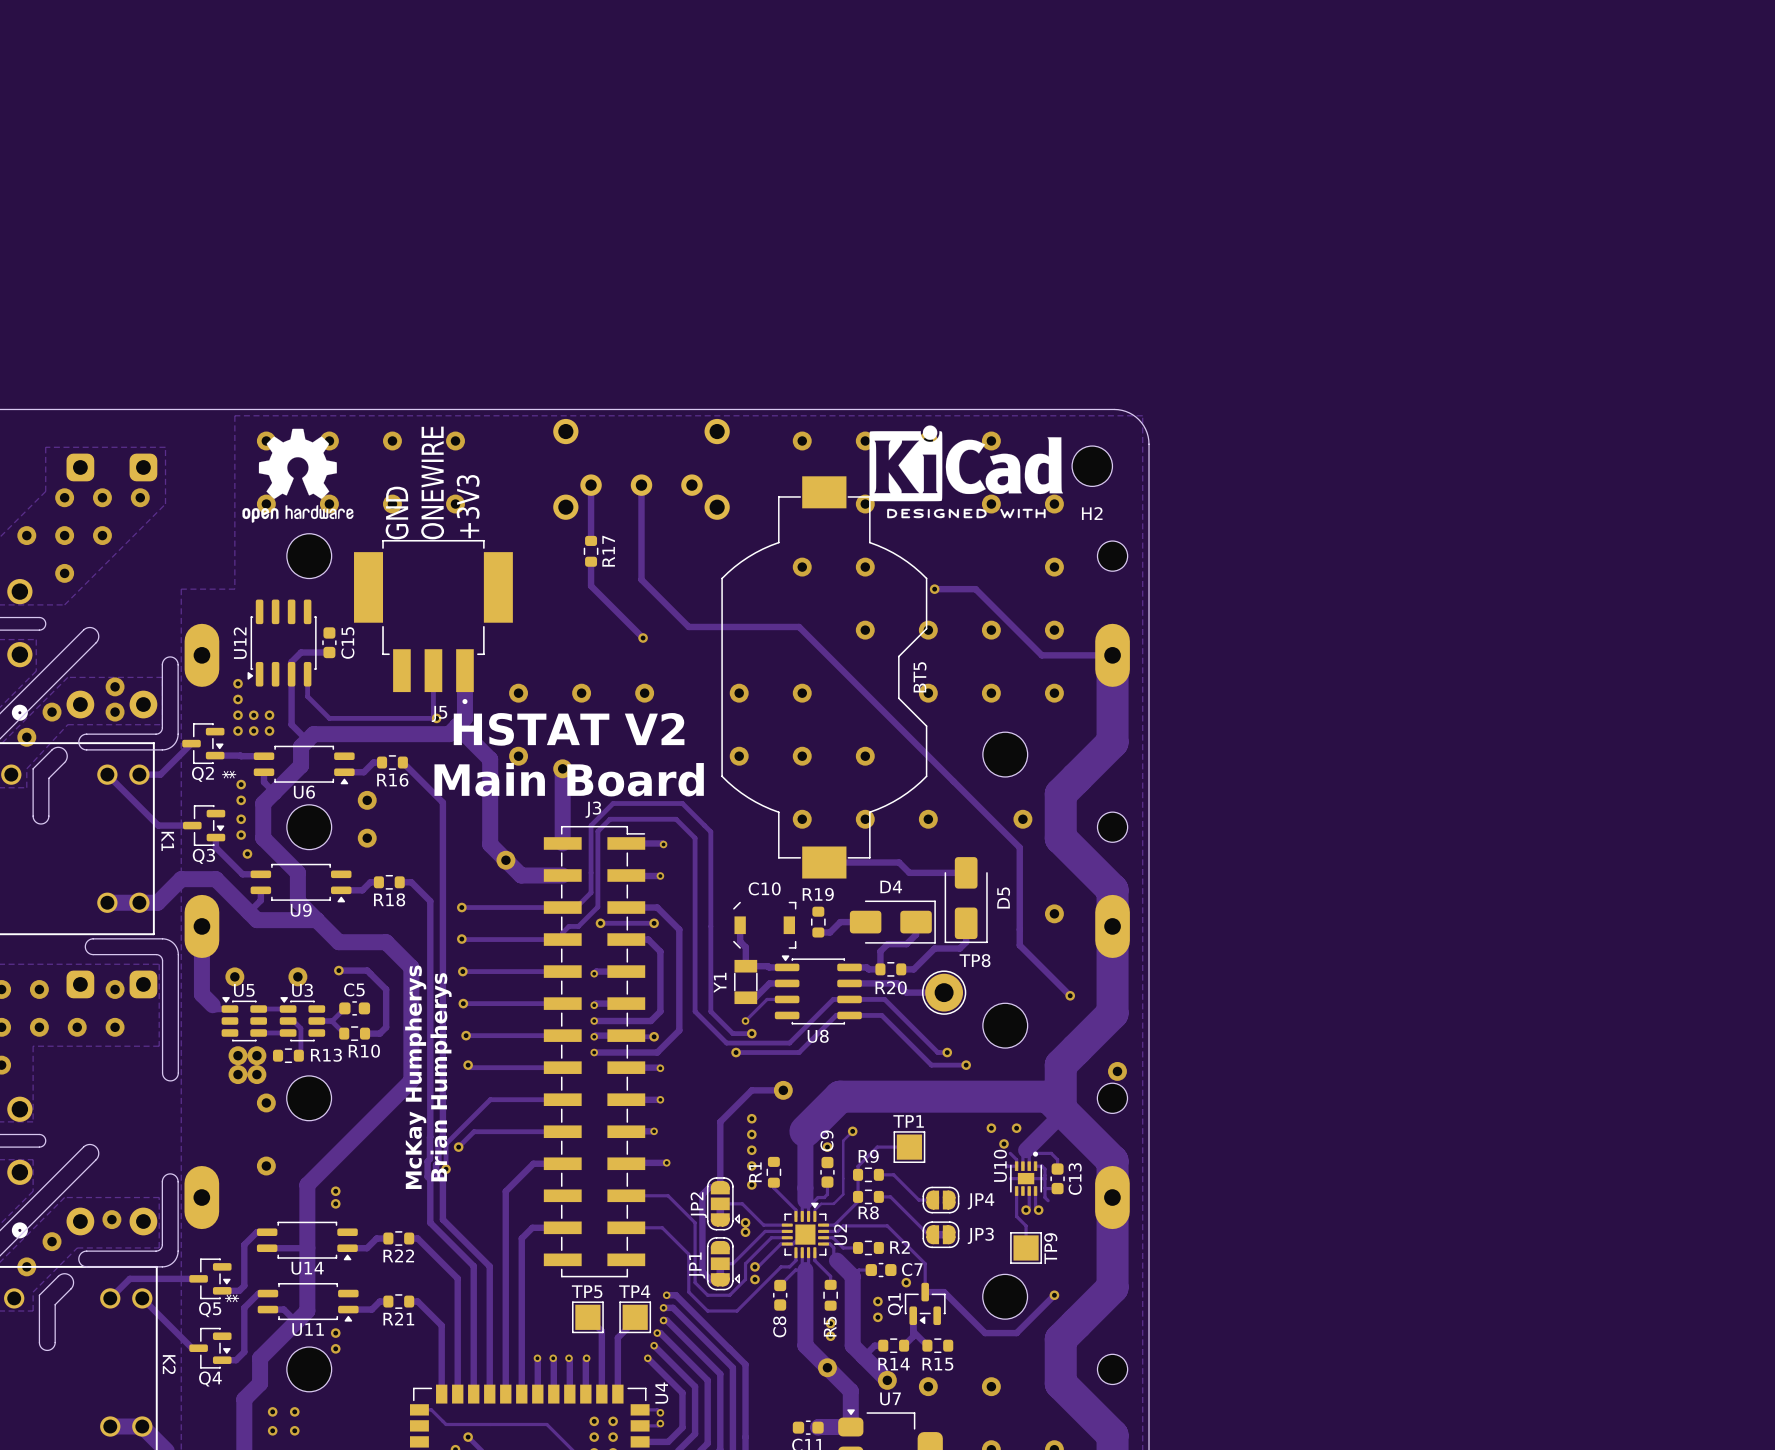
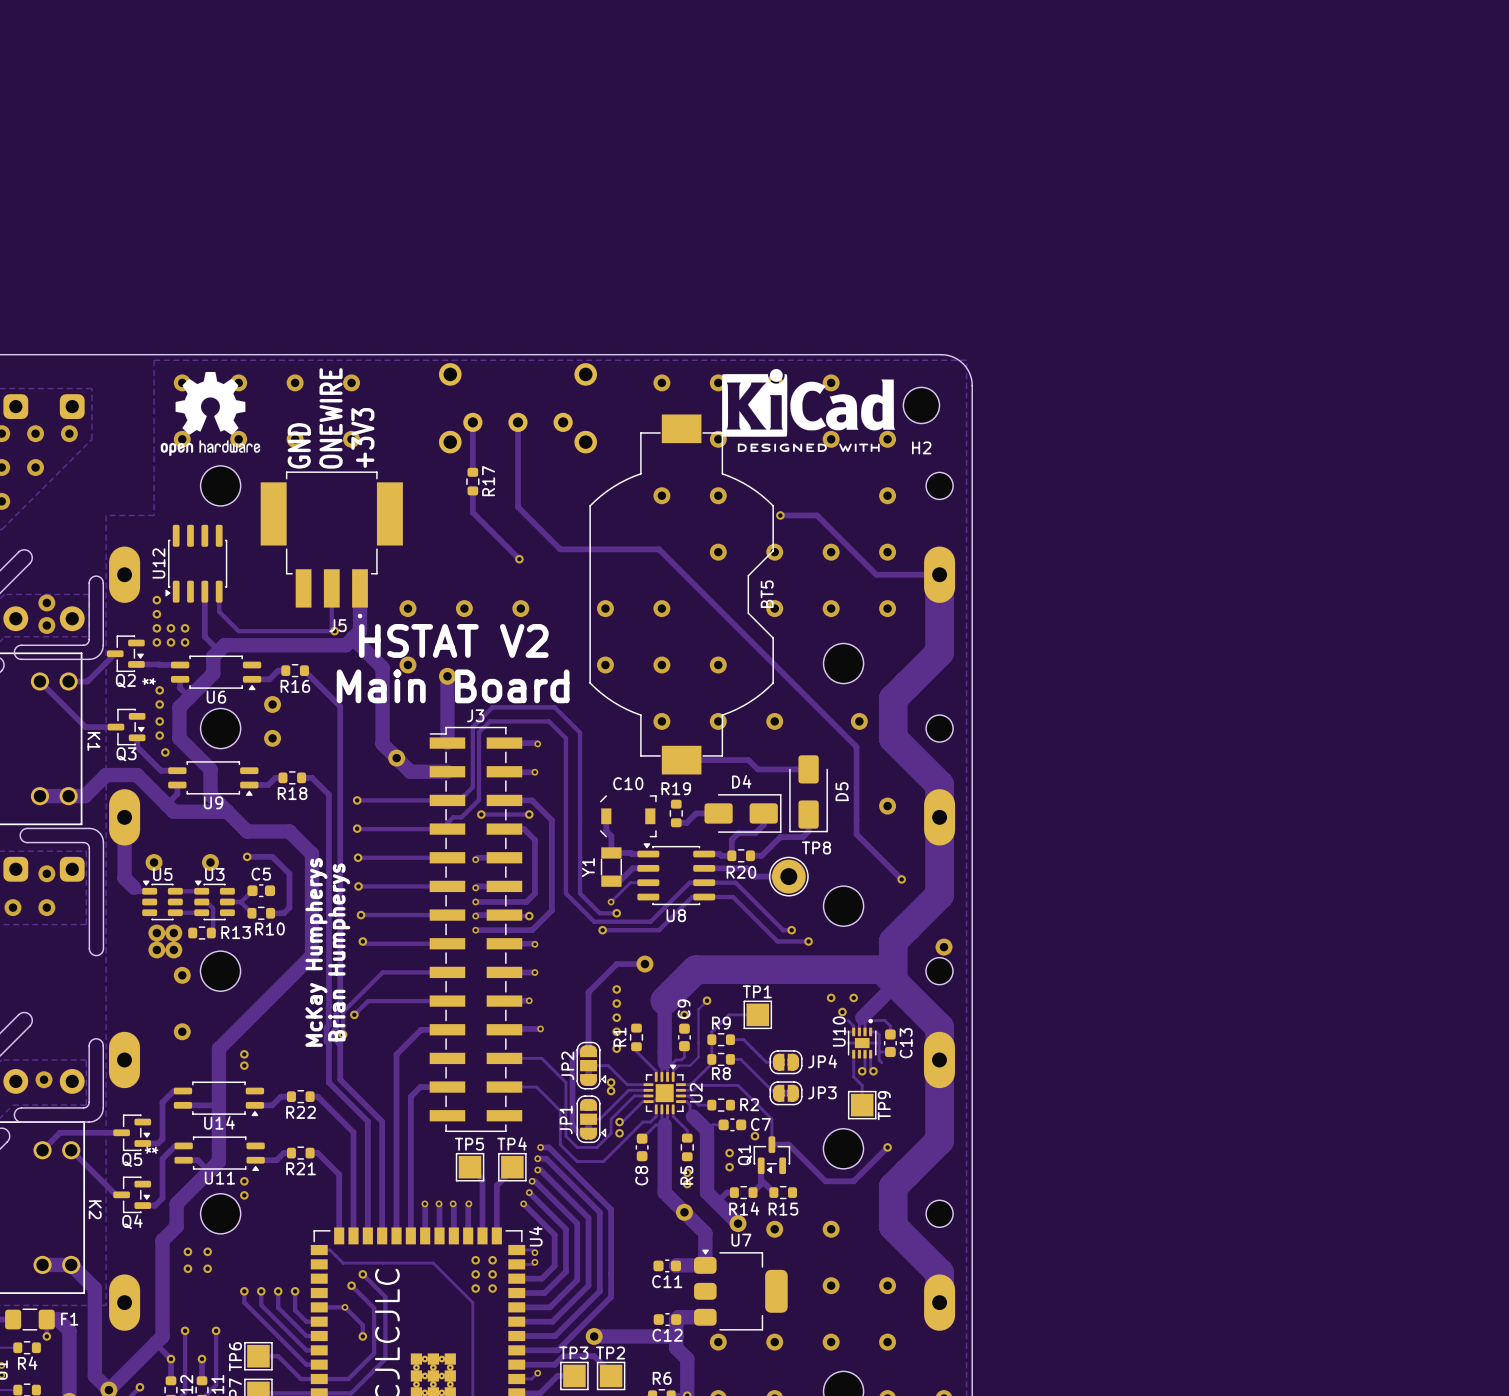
C15: (329, 642) -> none
track: (329, 652) (301, 652) (291, 661) (291, 674) -> none
J3 footprint: [543, 825, 646, 1278] -> [429, 726, 523, 1132]

